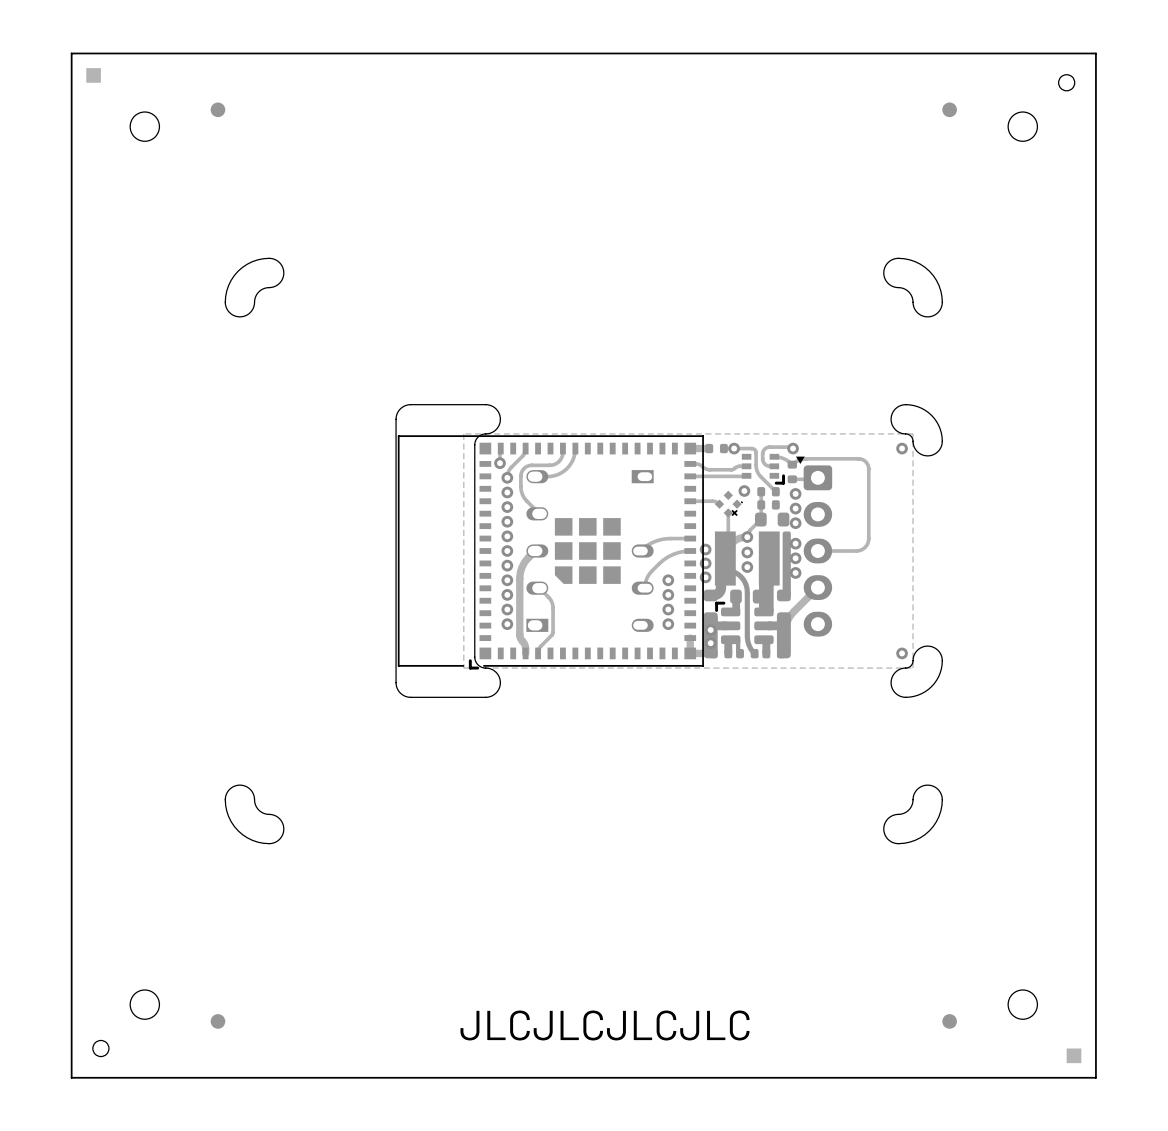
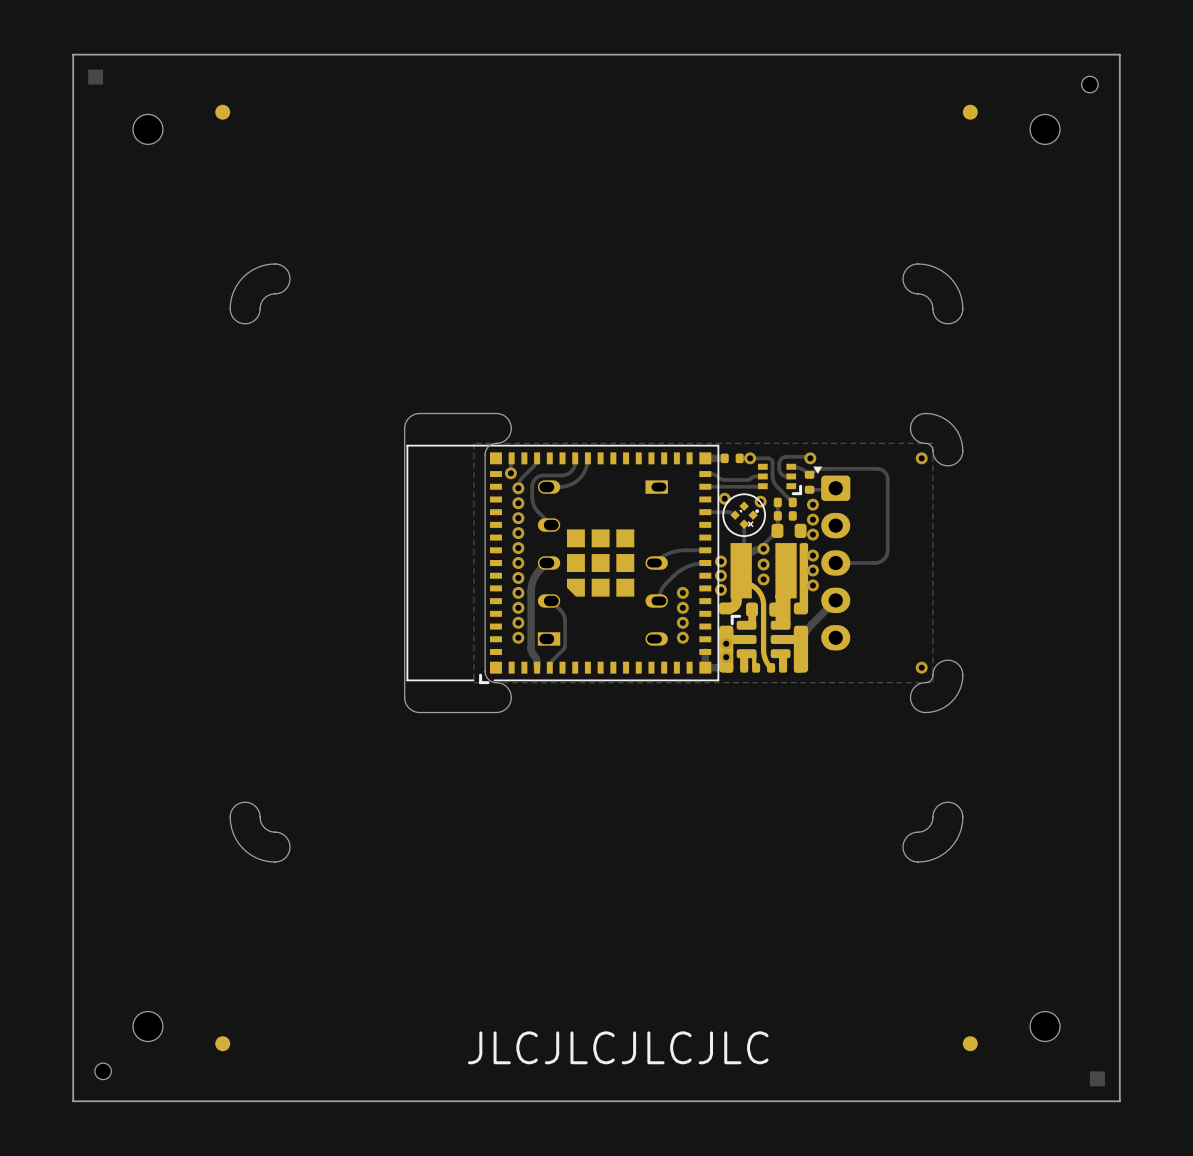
drawing: none -> [722, 493, 767, 537]
via: none -> (724, 498)
part footprint: [714, 490, 743, 518] -> [730, 501, 759, 529]

